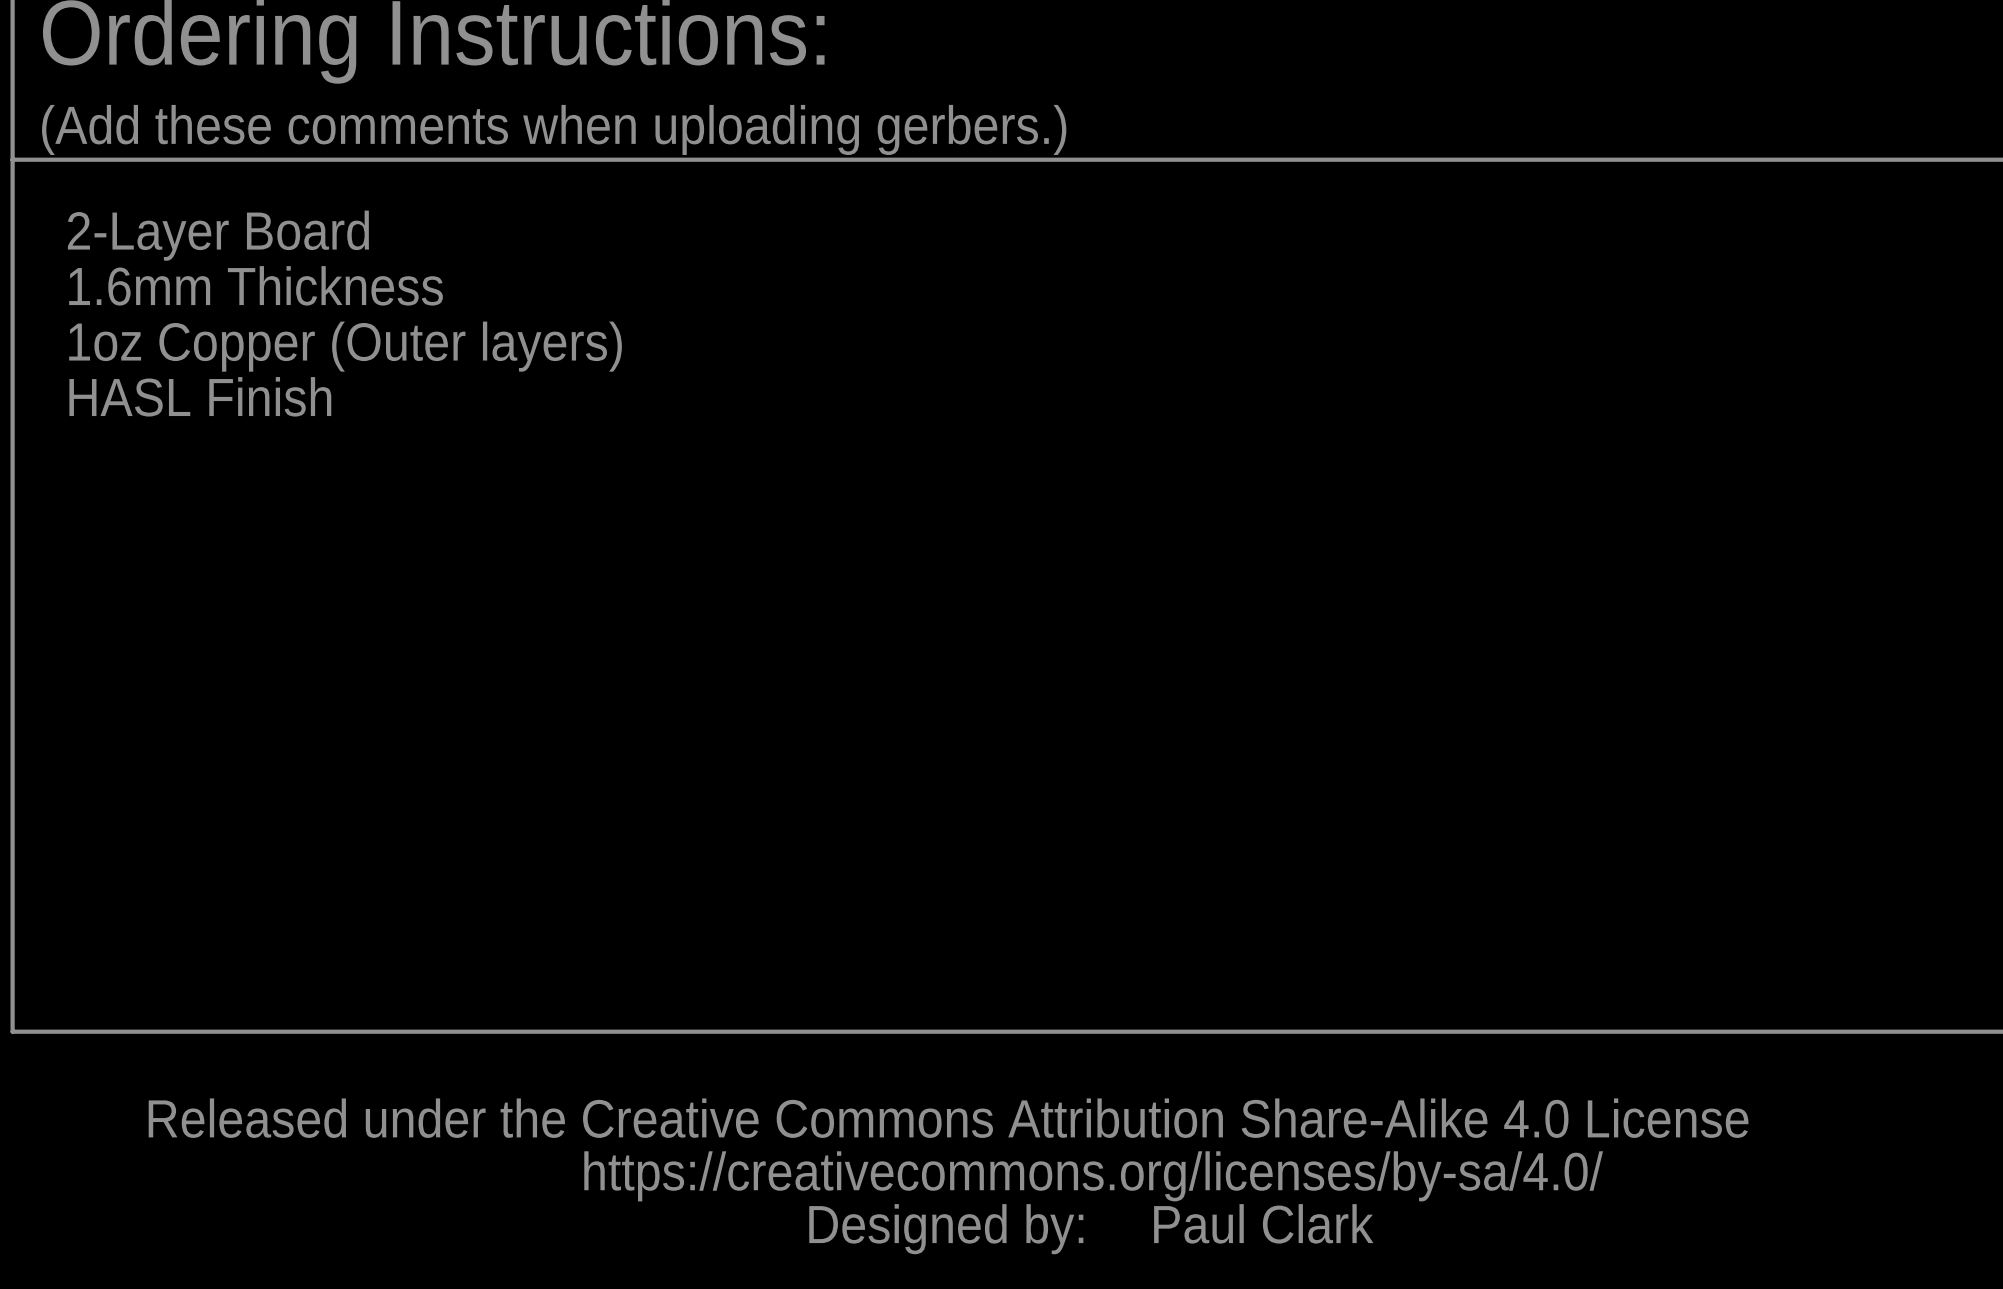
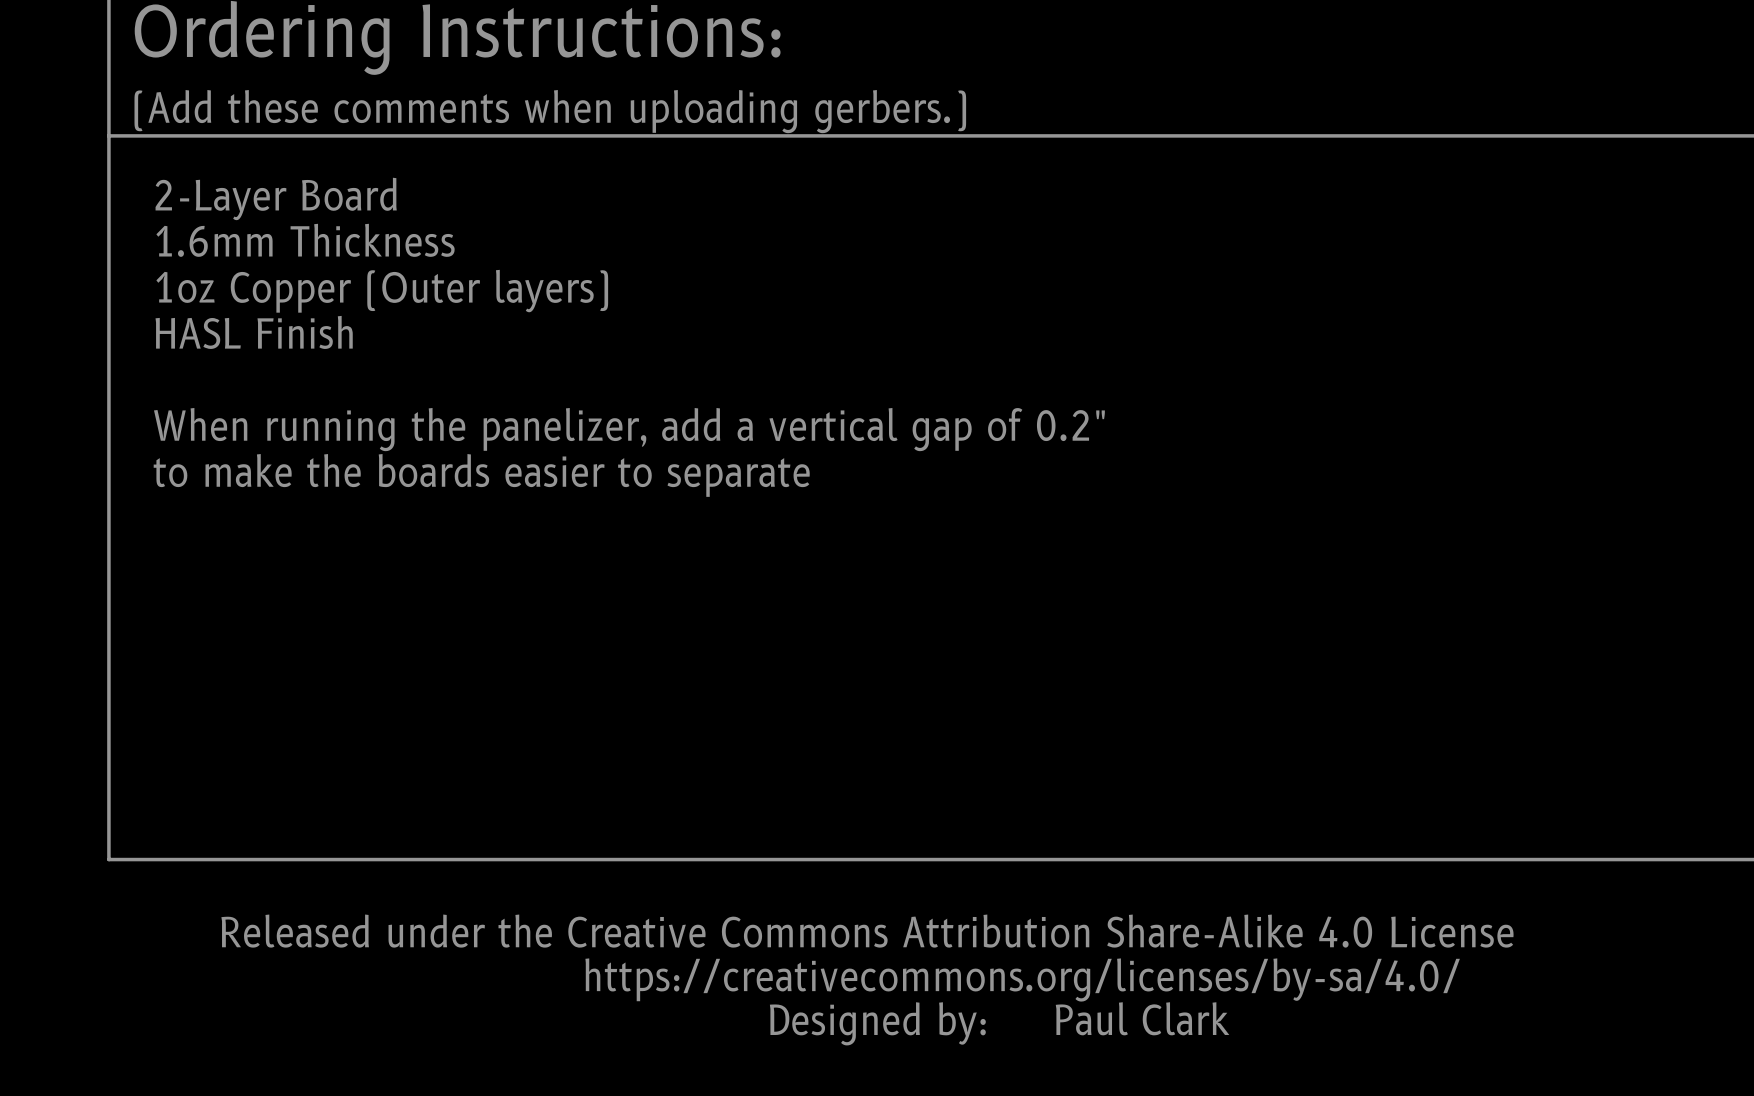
text: none -> When running the panelizer, add a vertical gap of 0.2" (629, 429)
text: none -> to make the boards easier to separate (481, 475)

